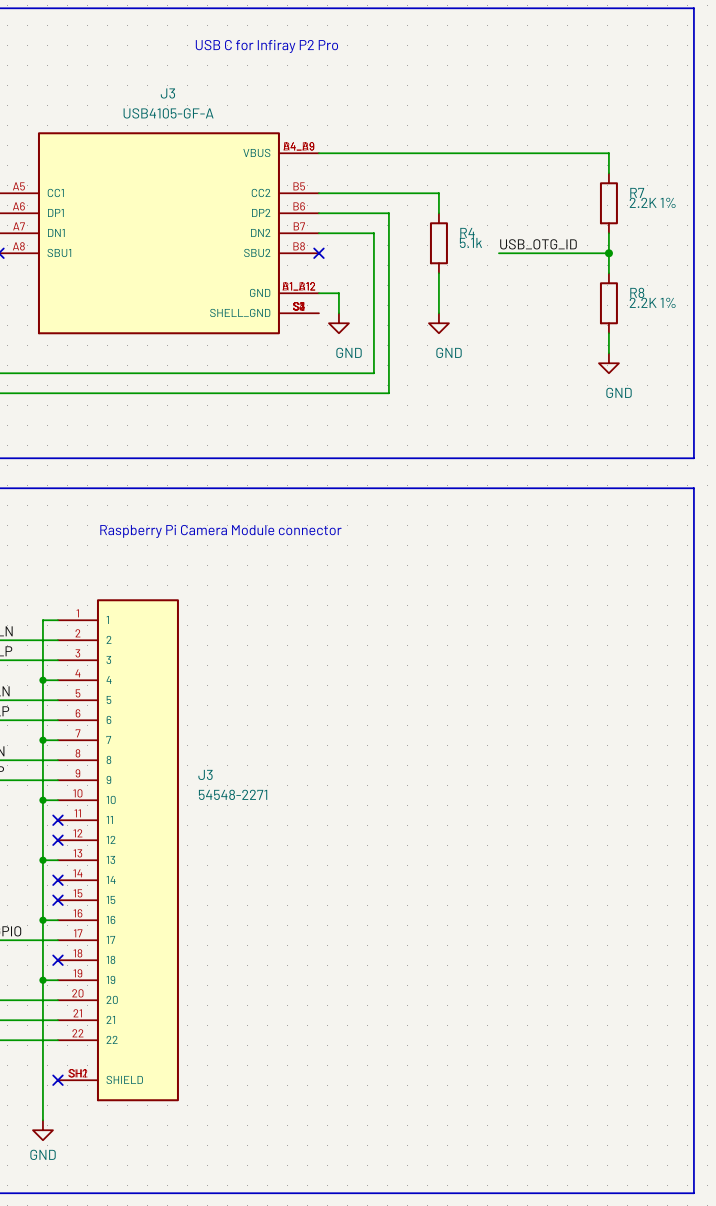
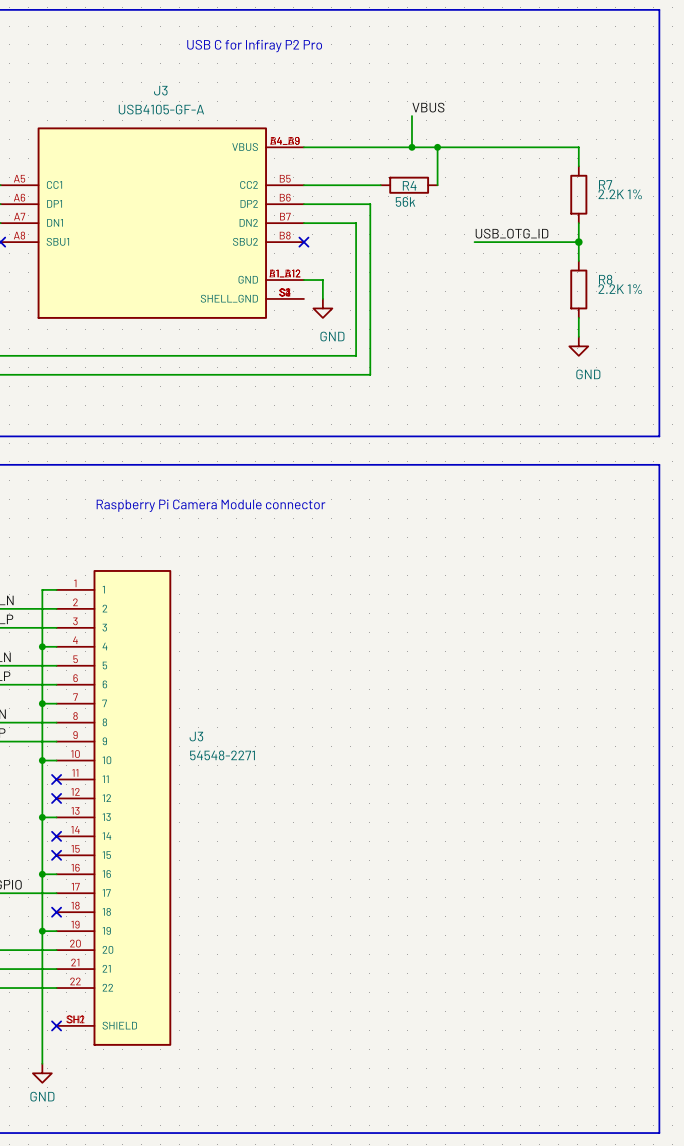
label: none -> VBUS (428, 107)
wire: none -> (411, 116) (411, 147)
junction: none -> (411, 147)
junction: none -> (437, 147)
wire: (399, 193) (438, 193) (438, 213) -> none
R4 name position: R4 (467, 232) -> R4 (409, 185)
R4 value: 5.1k (470, 242) -> 56k (405, 201)
R4 rotation: 0° (438, 243) -> 90° clockwise (409, 185)
R4 position: (438, 243) -> (409, 185)
wire: (438, 273) (438, 313) -> (437, 147) (437, 185)
power symbol: GND (438, 323) -> none

